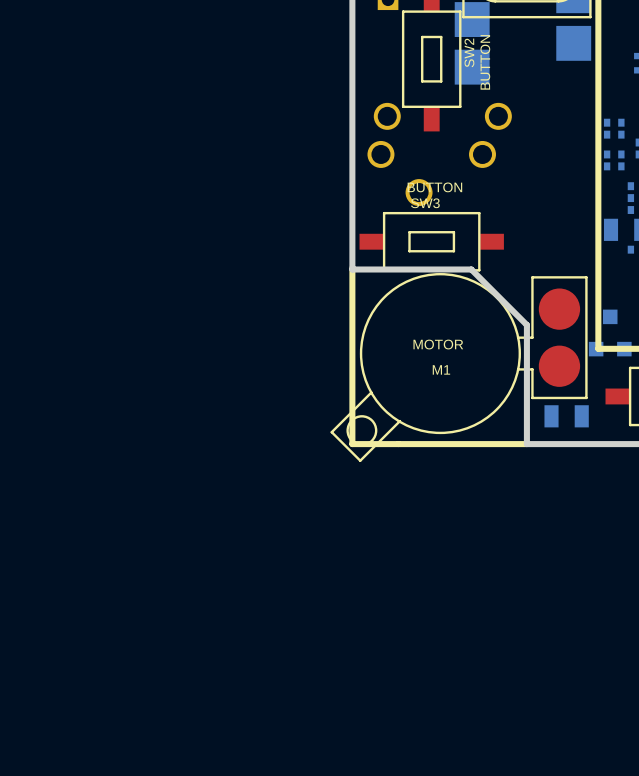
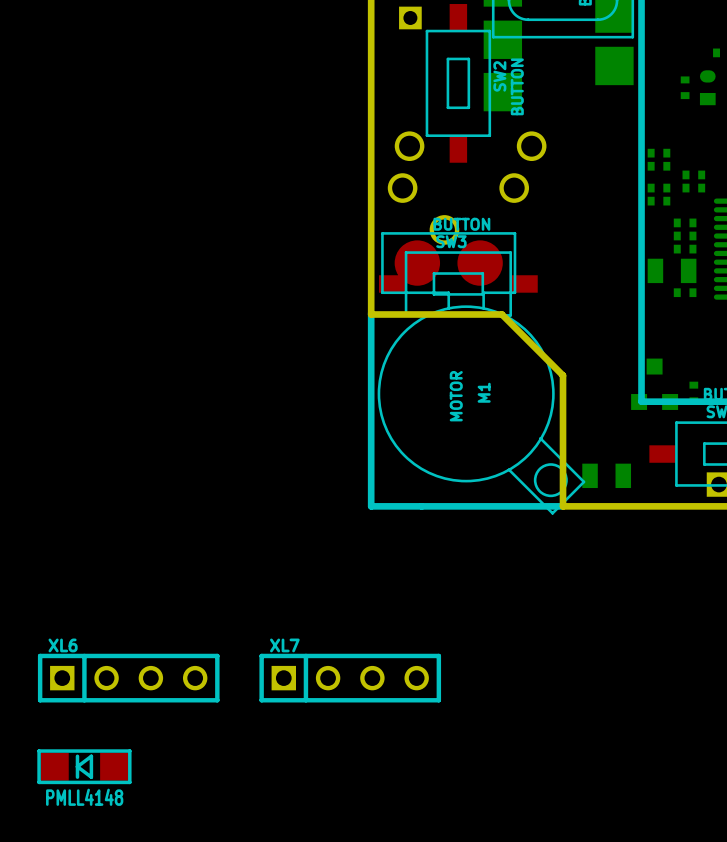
M1 rotation: 0° (459, 367) -> 90° counterclockwise (481, 373)
XL6: none -> (128, 678)
XL7: none -> (350, 678)
part: none -> PMLL4148 (84, 766)

